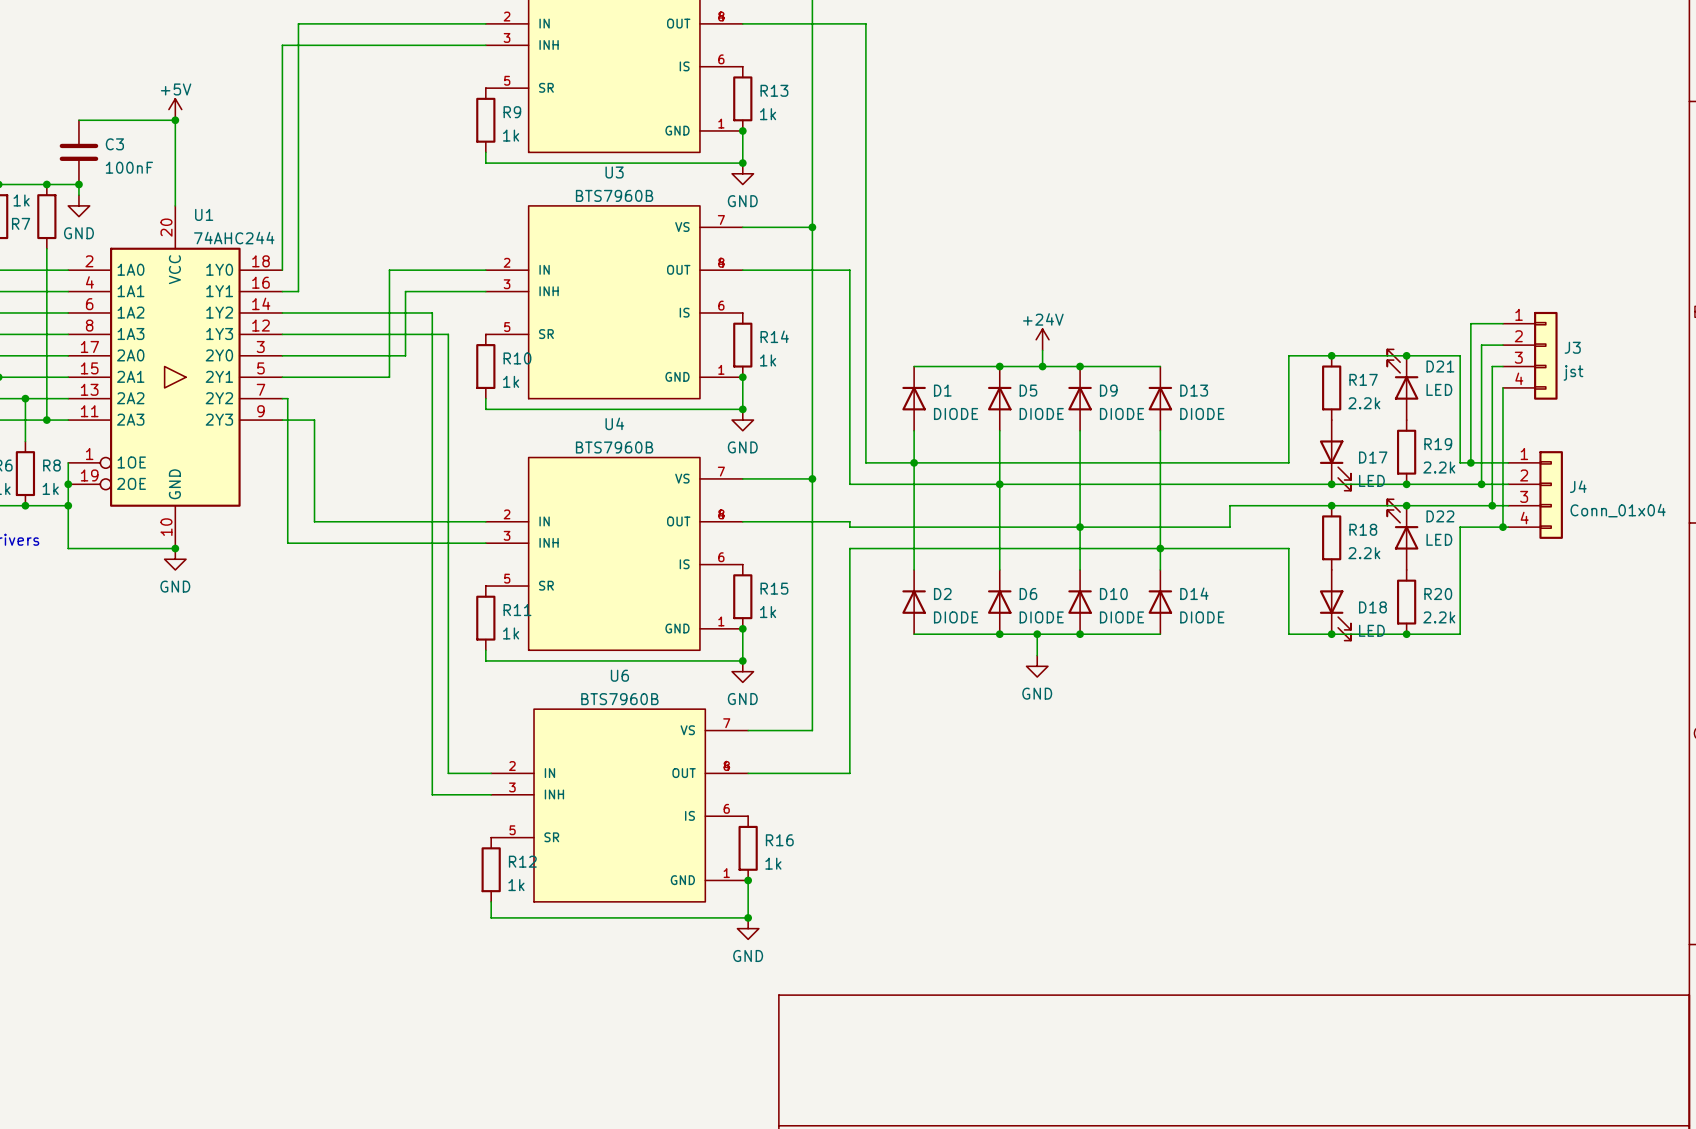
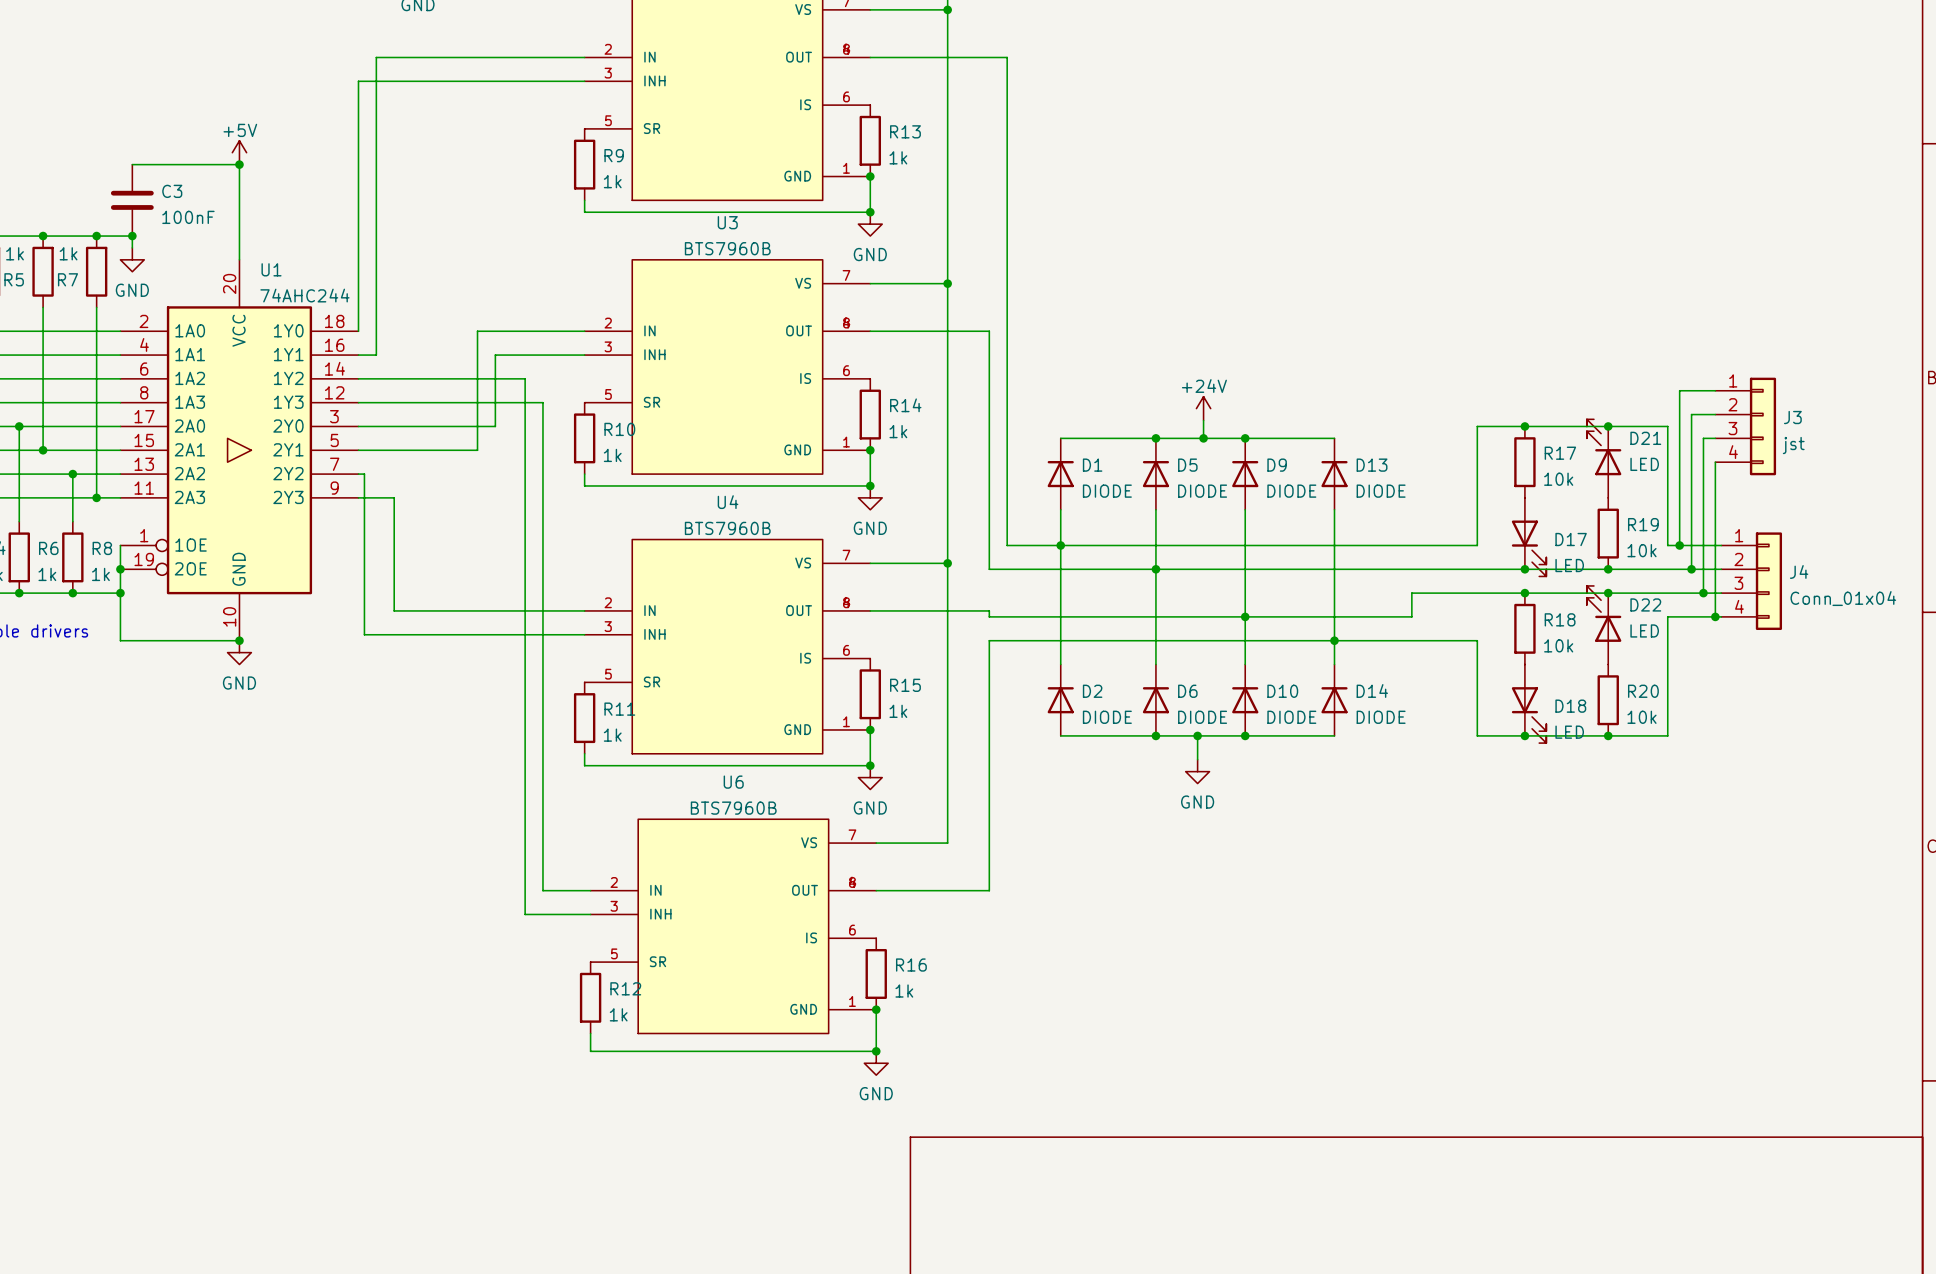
R17 value: 2.2k (1364, 403) -> 10k (1558, 479)
R19 value: 2.2k (1439, 467) -> 10k (1642, 550)
R18 value: 2.2k (1364, 553) -> 10k (1558, 645)
R20 value: 2.2k (1439, 617) -> 10k (1642, 717)

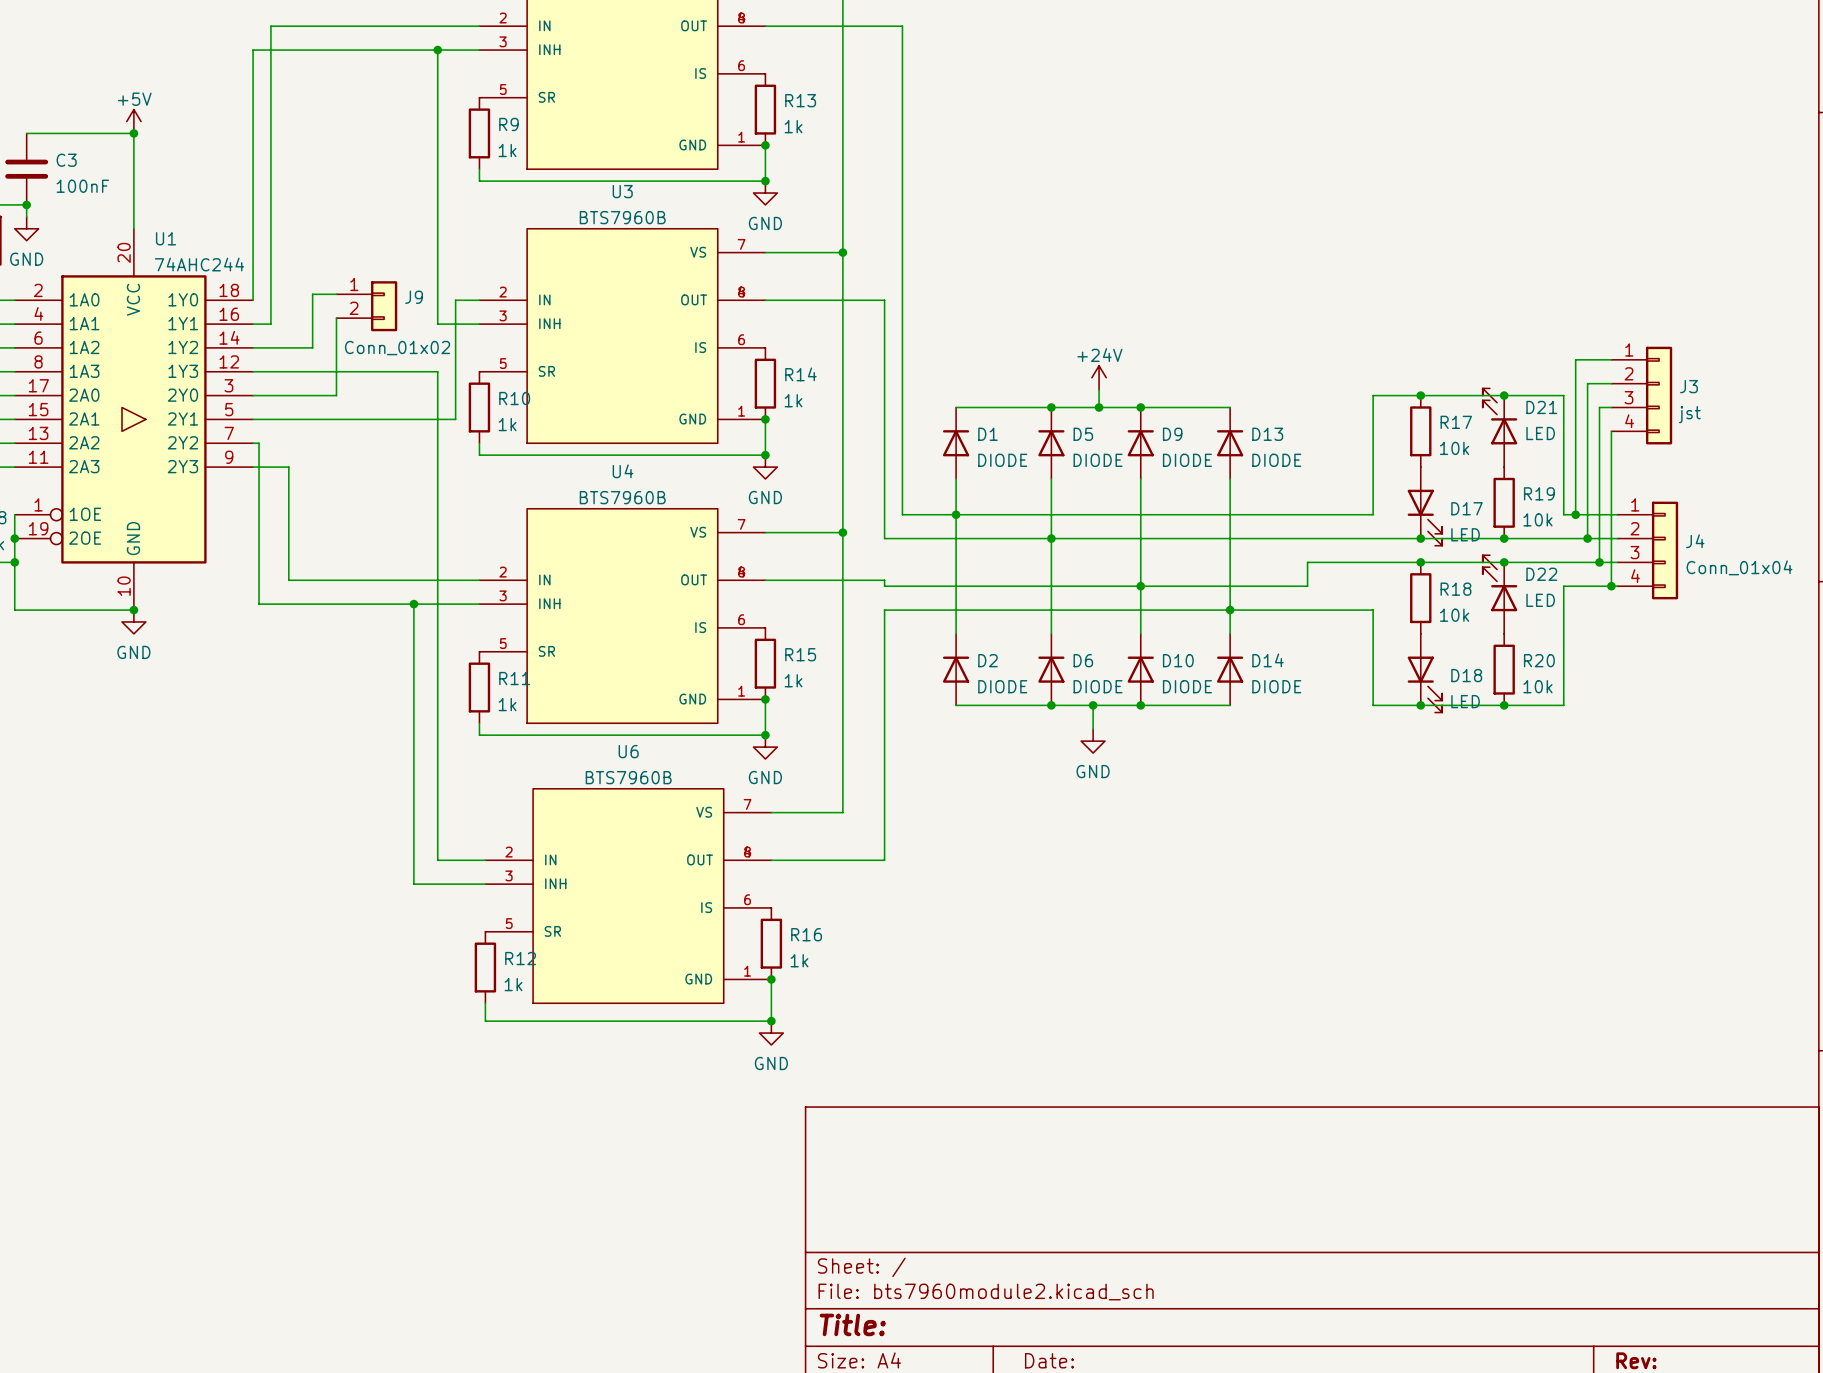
wire: none -> (437, 50) (437, 324)
junction: none -> (437, 50)
wire: none -> (336, 294) (312, 294) (312, 347)
wire: (560, 331) (477, 331) (477, 450) -> (455, 300) (455, 419) (372, 419)
J9: none -> Conn_01x02 (366, 306)
wire: (542, 355) (495, 355) (495, 426) (441, 426) -> (336, 318) (336, 395)
wire: (418, 378) (525, 378) (525, 914) -> (413, 604) (413, 884) (419, 884)
junction: none -> (413, 604)

